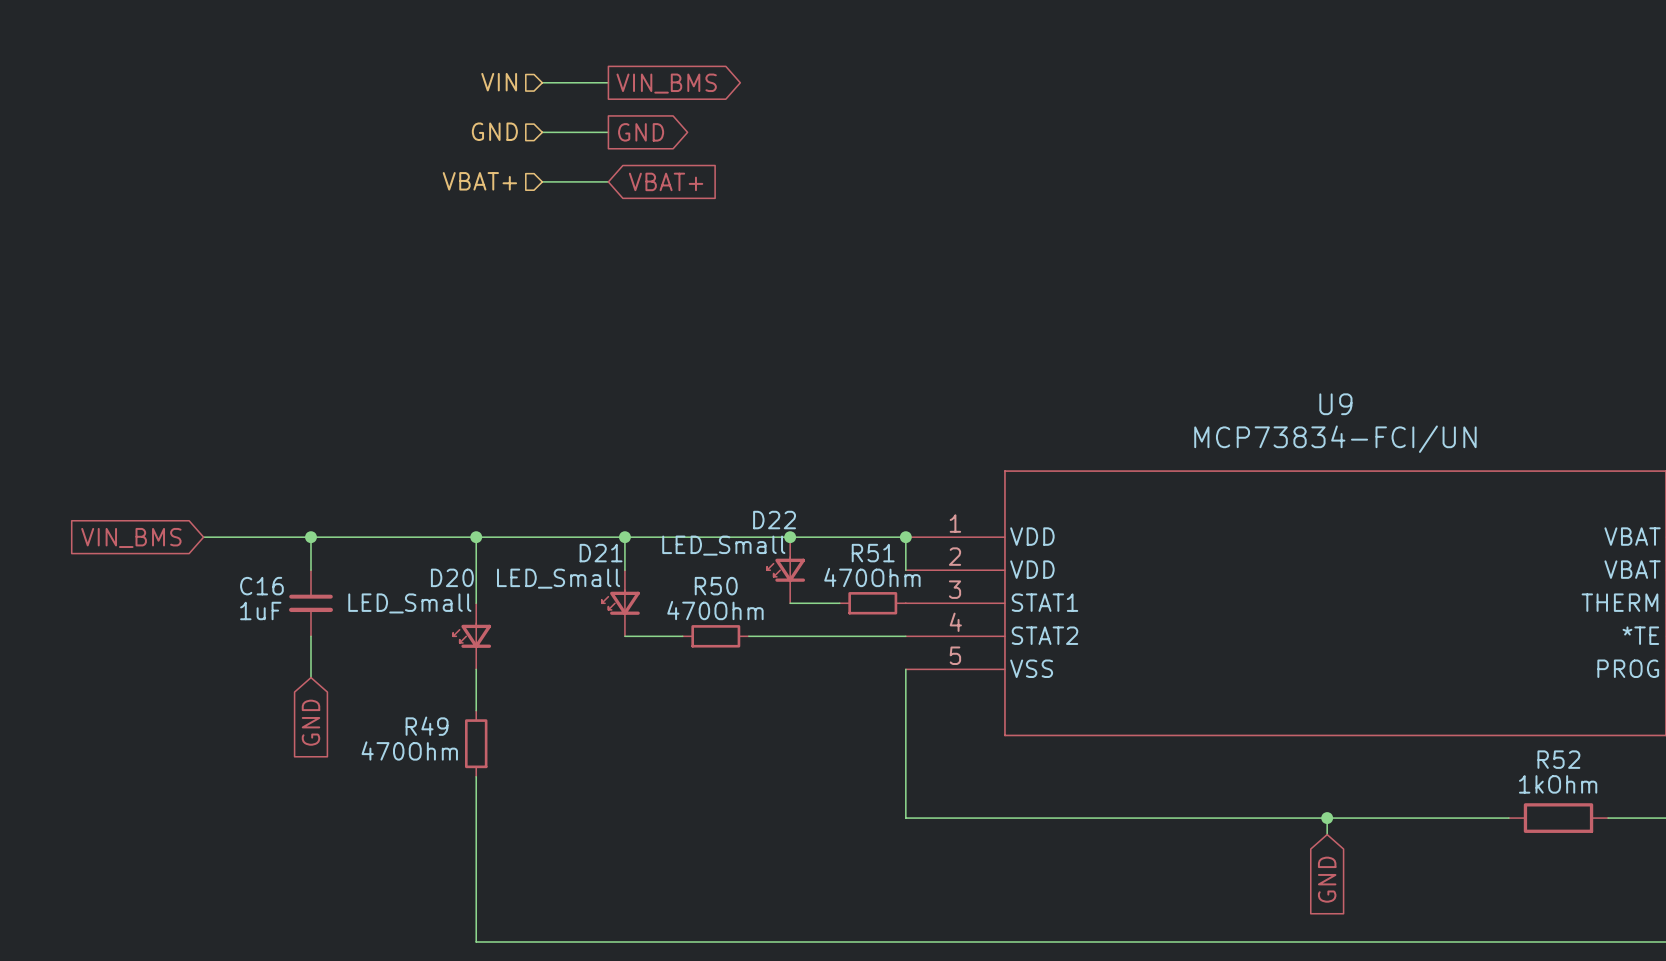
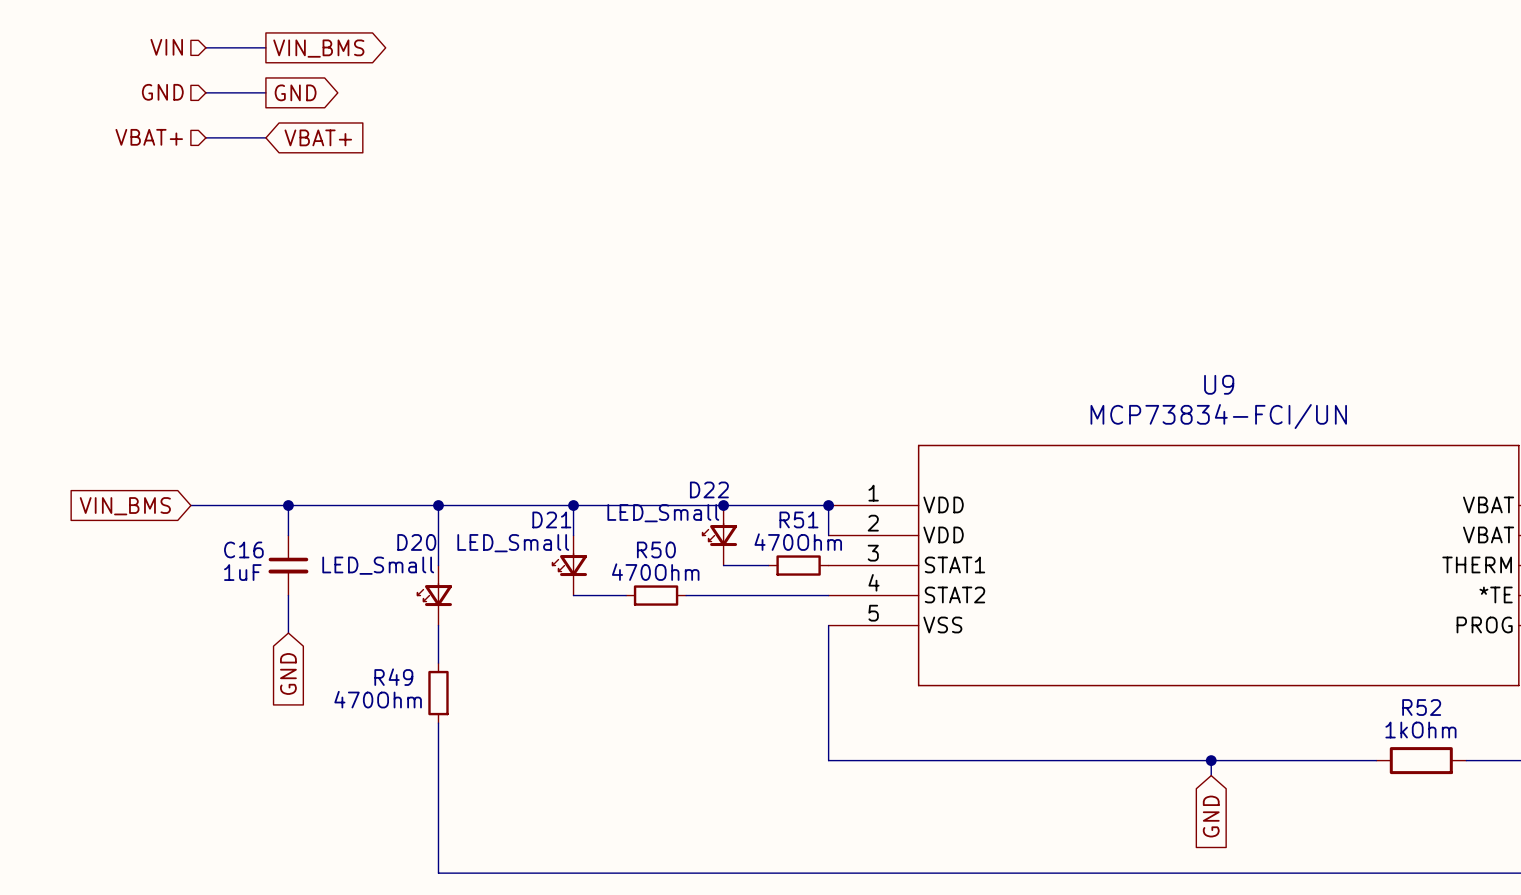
hierarchical label: none -> VIN (166, 47)
wire: none -> (205, 47) (265, 47)
global label: none -> VIN_BMS (318, 48)
hierarchical label: none -> GND (162, 92)
global label: none -> GND (295, 92)
hierarchical label: VIN (499, 82) -> none
wire: (542, 82) (608, 82) -> (205, 92) (265, 92)
global label: VIN_BMS (666, 83) -> none
hierarchical label: none -> VBAT+ (149, 137)
hierarchical label: GND (494, 131) -> none
global label: none -> VBAT+ (318, 137)
wire: (542, 132) (608, 132) -> (205, 137) (265, 137)
global label: GND (641, 132) -> none
hierarchical label: VBAT+ (479, 181) -> none
wire: (542, 181) (608, 181) -> none
global label: VBAT+ (666, 181) -> none

